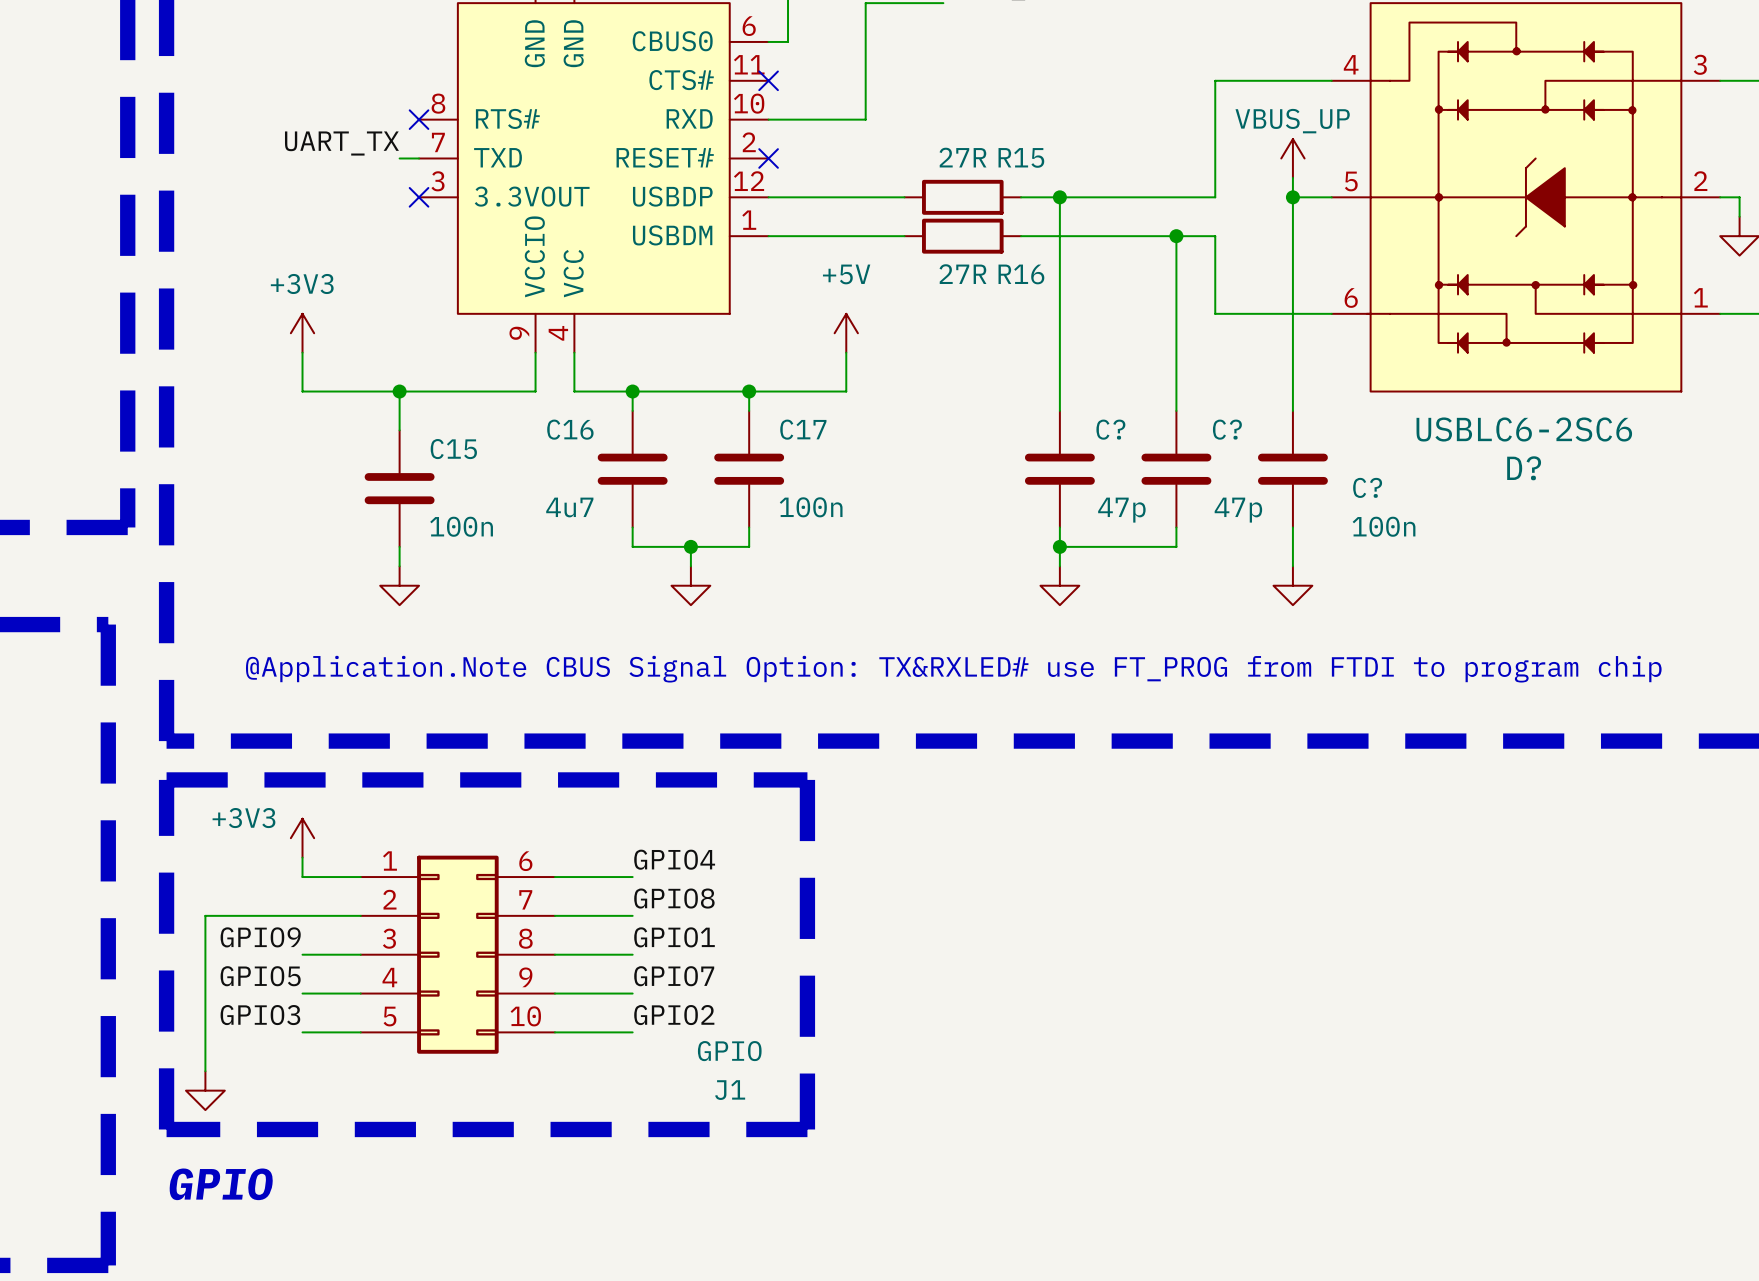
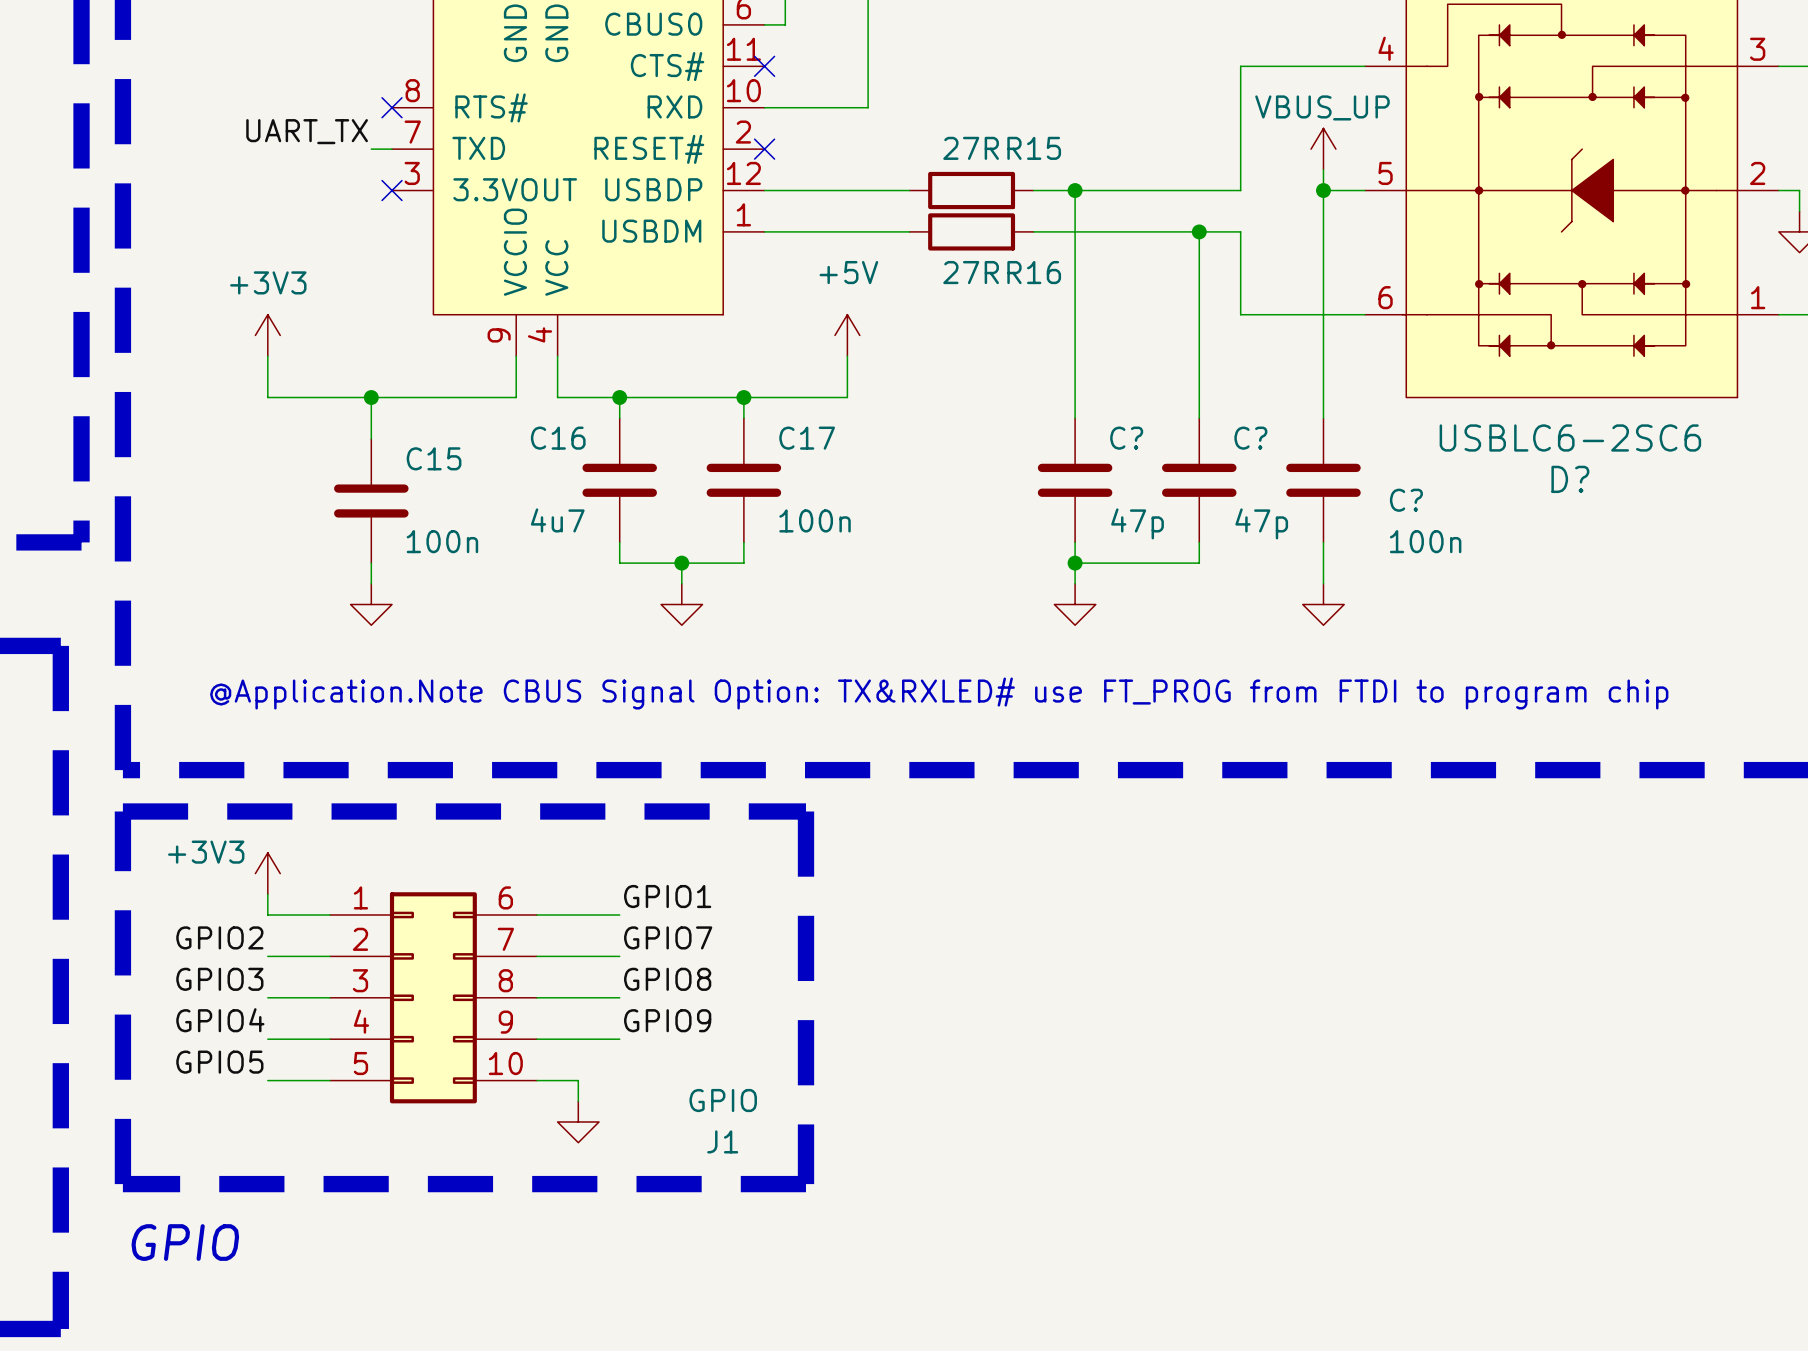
label: GPIO4 (674, 859) -> GPIO1 (667, 896)
label: GPIO8 (674, 898) -> GPIO7 (668, 937)
wire: (302, 915) (205, 915) (205, 1071) -> none
label: GPIO9 (260, 937) -> GPIO3 (219, 979)
label: GPIO1 (674, 937) -> GPIO8 (667, 979)
label: GPIO5 (260, 976) -> GPIO4 (220, 1020)
label: GPIO7 (674, 976) -> GPIO9 (667, 1020)
label: GPIO3 (260, 1015) -> GPIO5 (219, 1062)
label position: GPIO2 (674, 1015) -> GPIO2 (219, 937)
wire: (593, 1032) (632, 1032) -> (578, 1080) (578, 1101)
power symbol: none -> (578, 1121)
power symbol: (205, 1090) -> none

